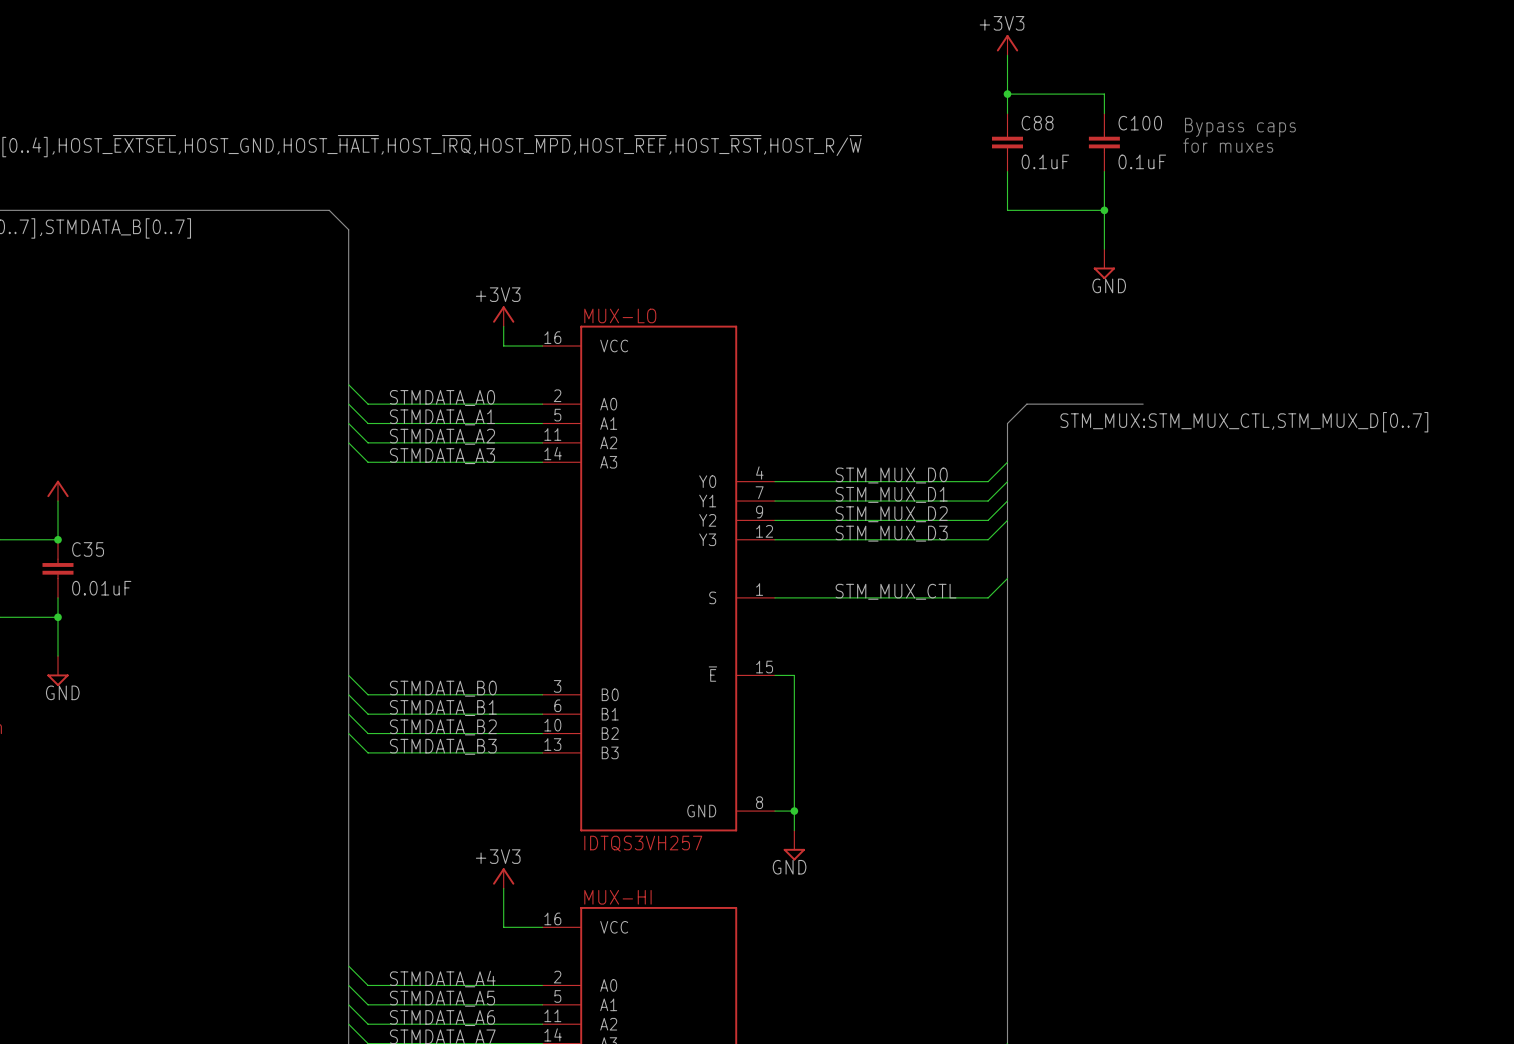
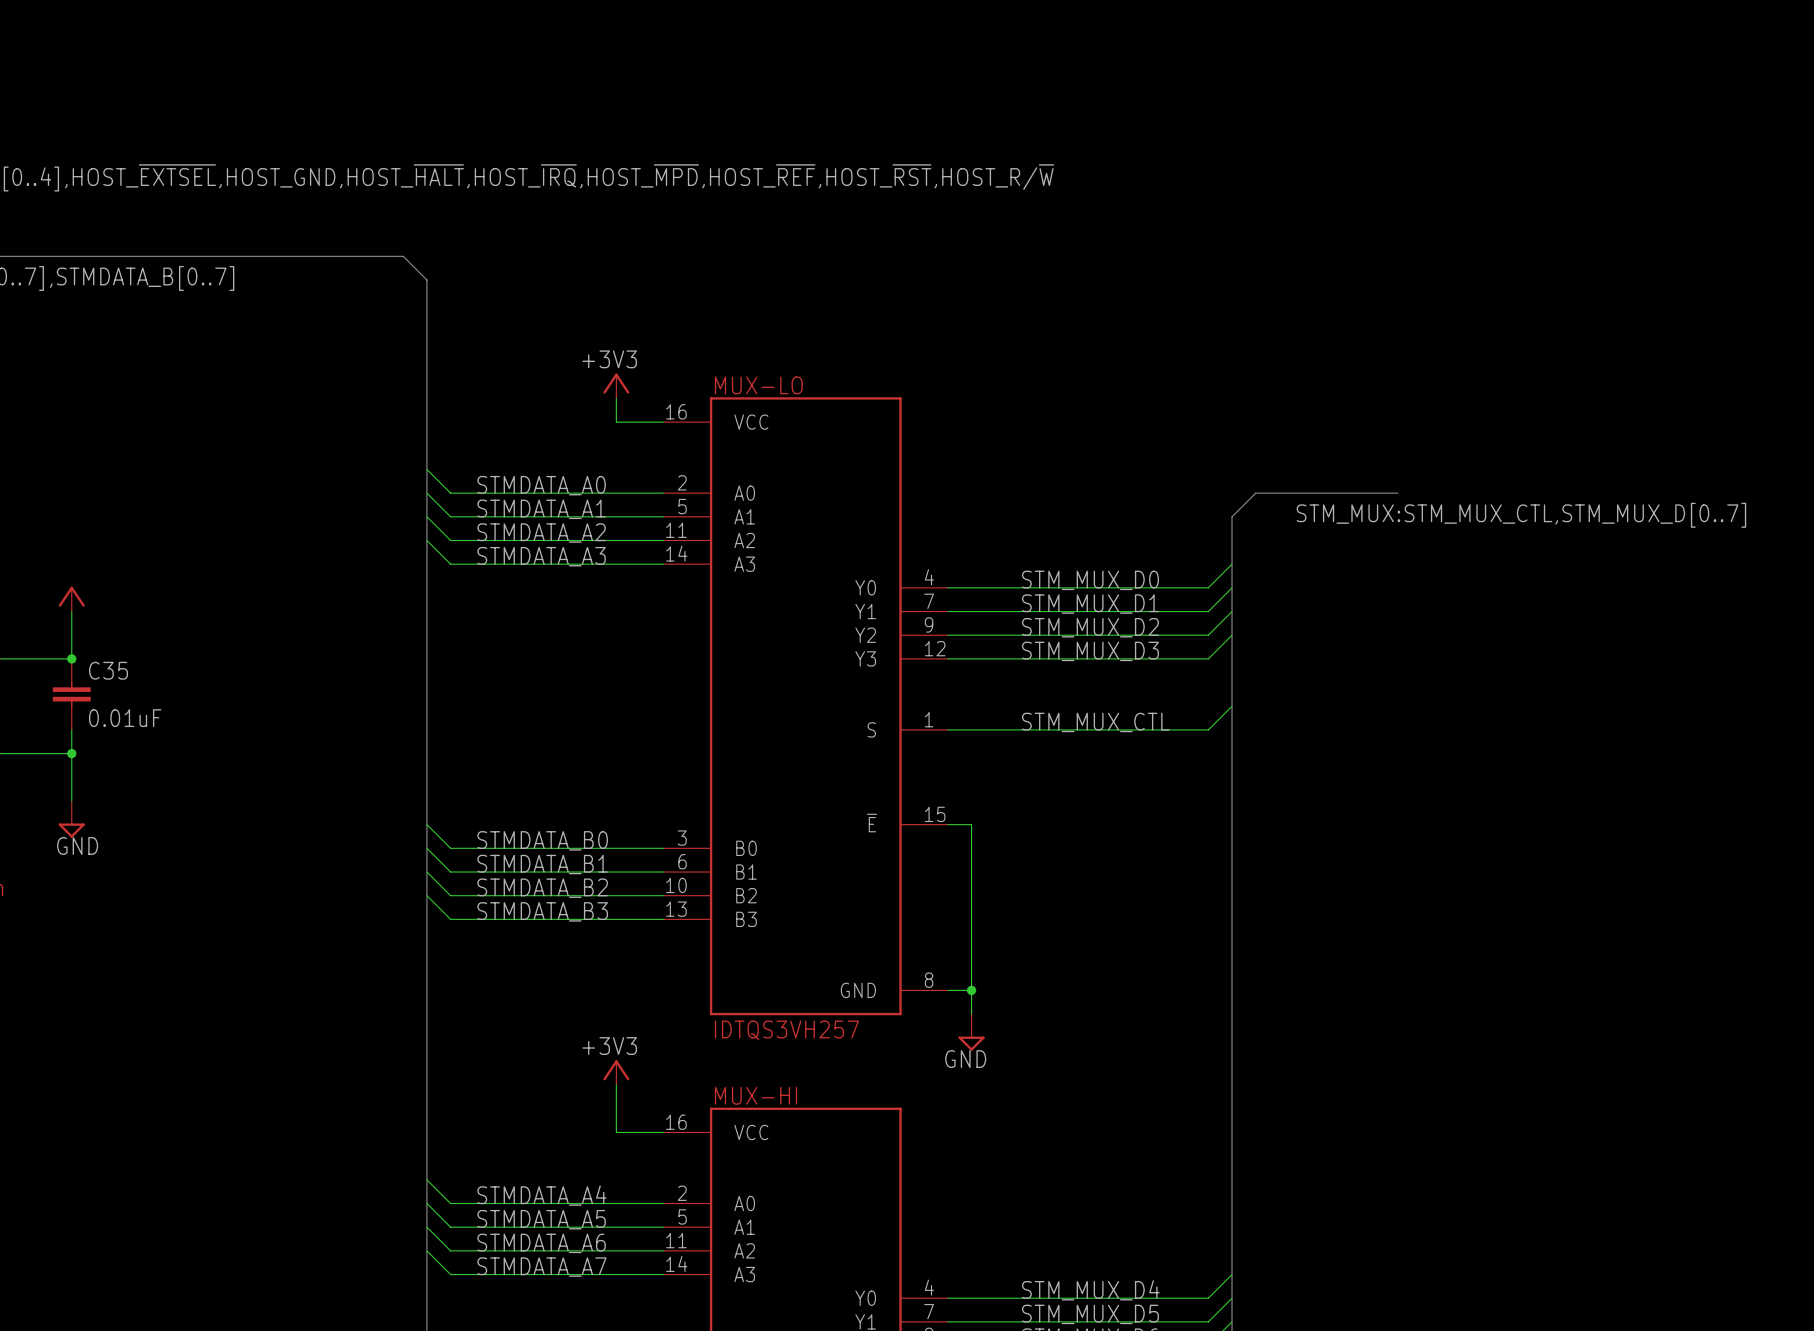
power symbol: +3V3 (1007, 45) -> none
wire: (1007, 55) (1007, 113) -> none
wire: (1007, 94) (1104, 94) (1104, 113) -> none
junction: (1007, 94) -> none
text: Bypass caps (1240, 127) -> none
C88: 0.1uF (1007, 142) -> none
C100: 0.1uF (1104, 142) -> none
text: for muxes (1228, 145) -> none
wire: (1007, 171) (1007, 210) (1104, 210) -> none
wire: (1104, 171) (1104, 249) -> none
junction: (1104, 210) -> none
power symbol: GND (1104, 264) -> none

